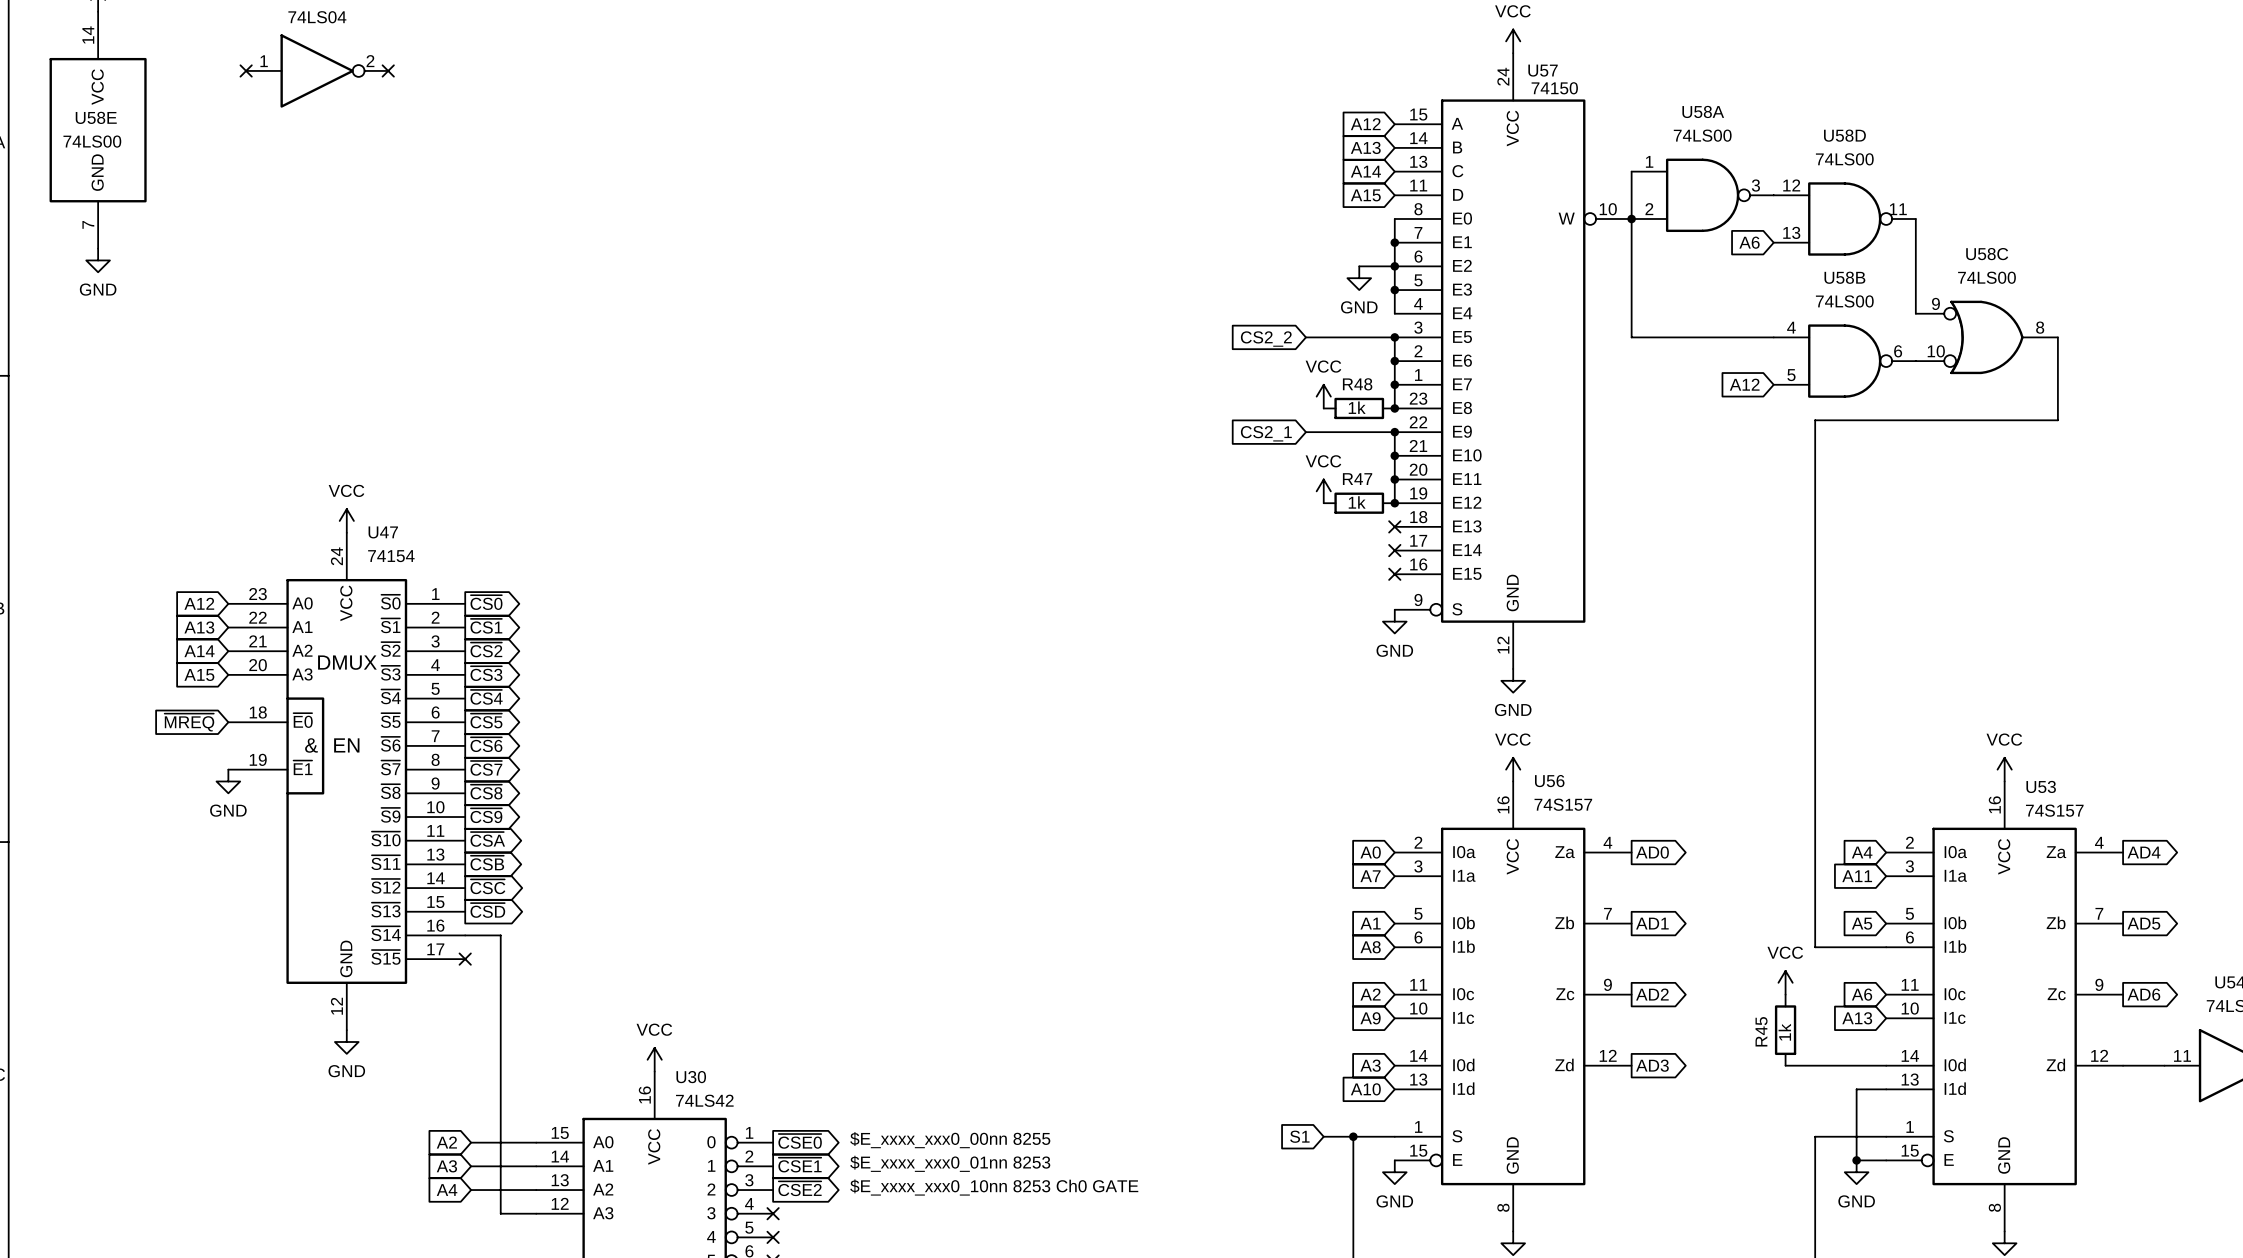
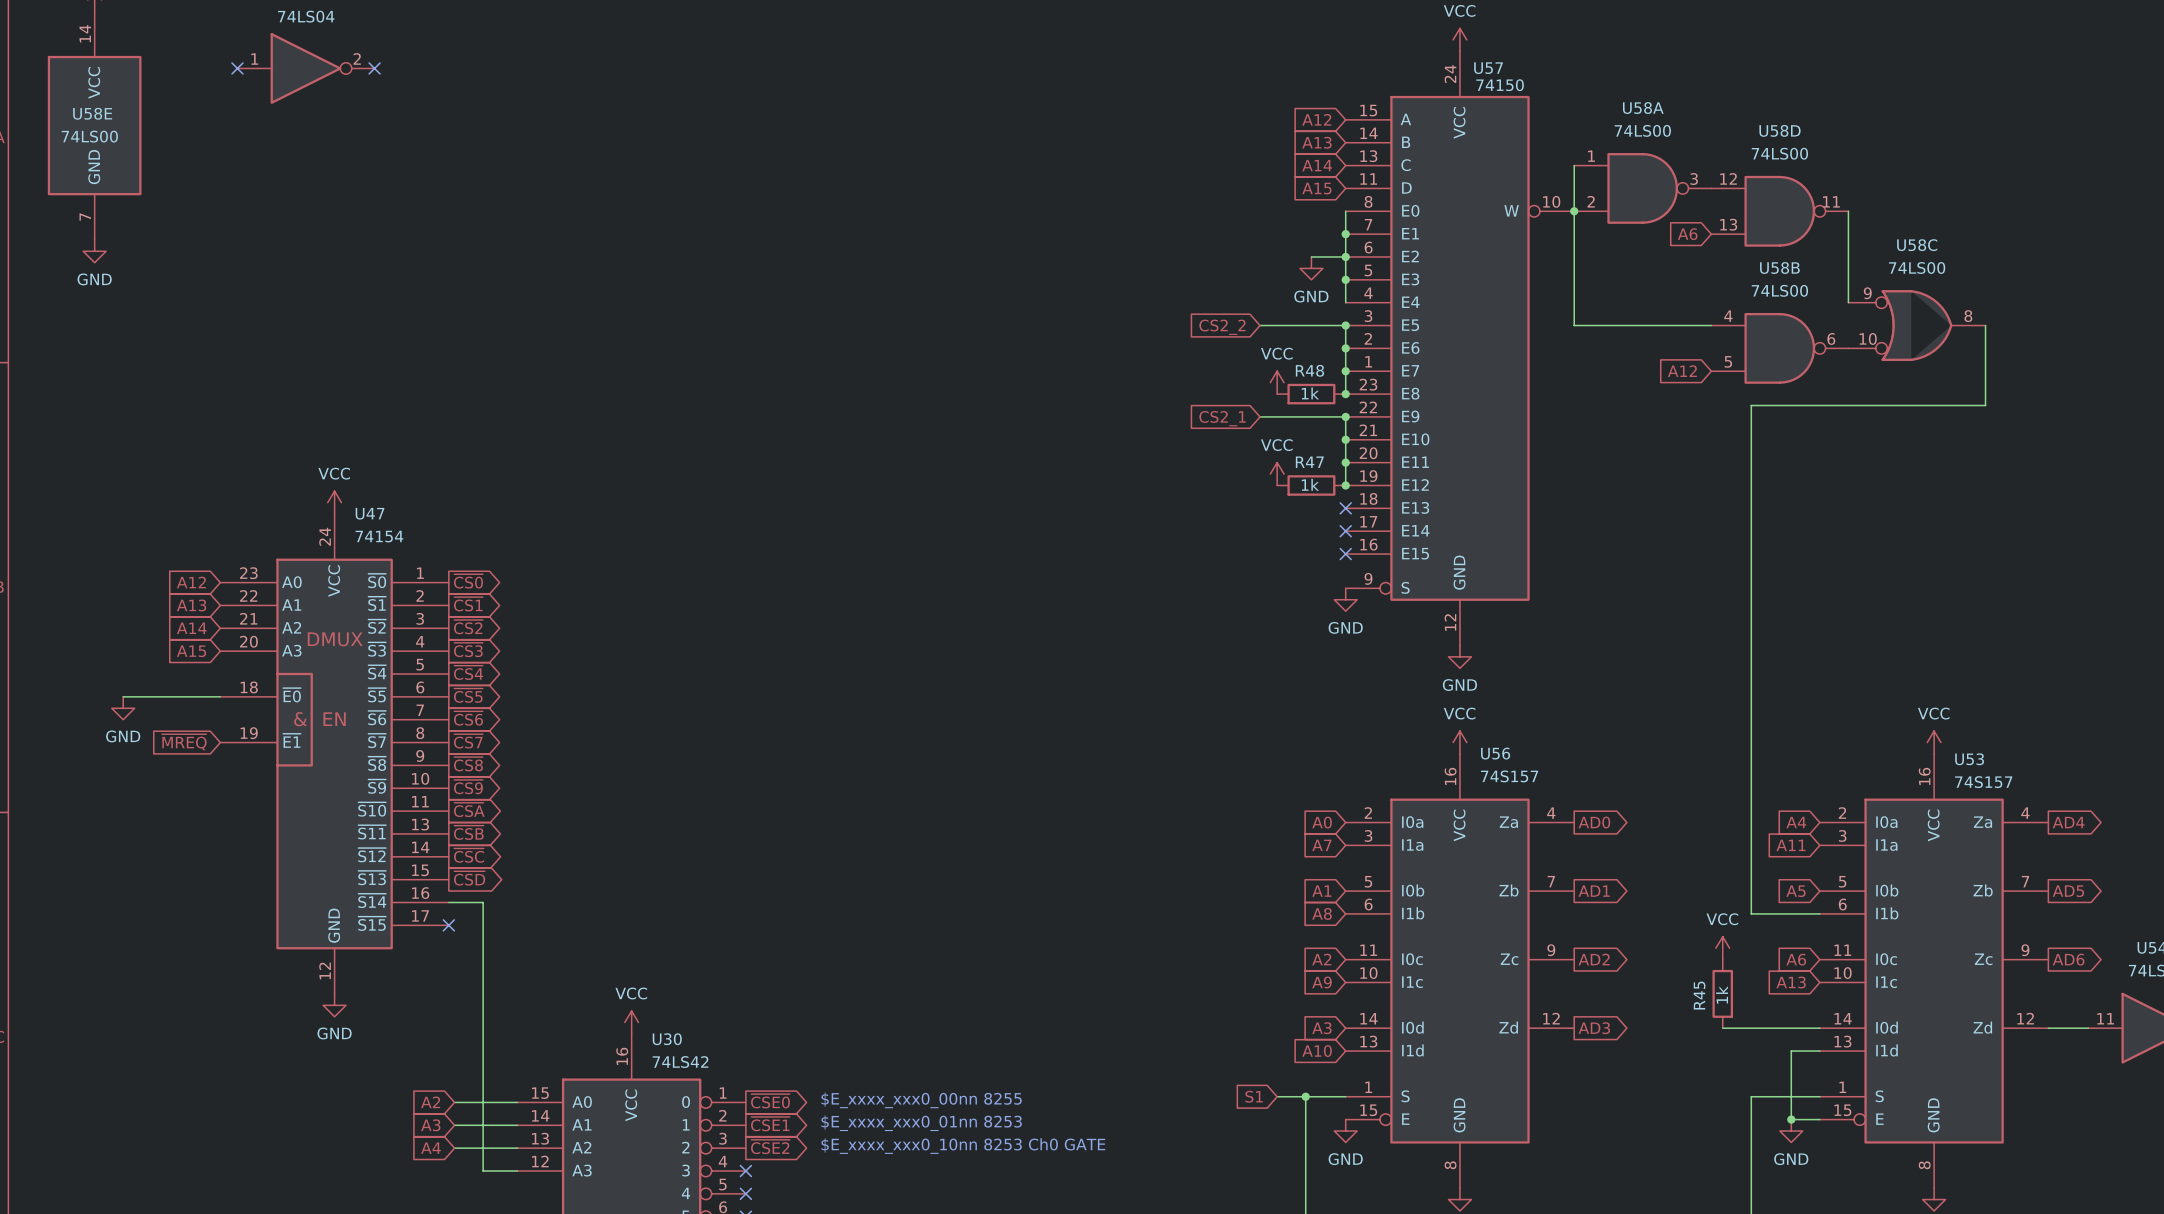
wire: none -> (123, 696) (220, 696)
global label position: ~{MREQ} (189, 722) -> ~{MREQ} (184, 742)
power symbol position: GND (228, 781) -> GND (123, 708)

